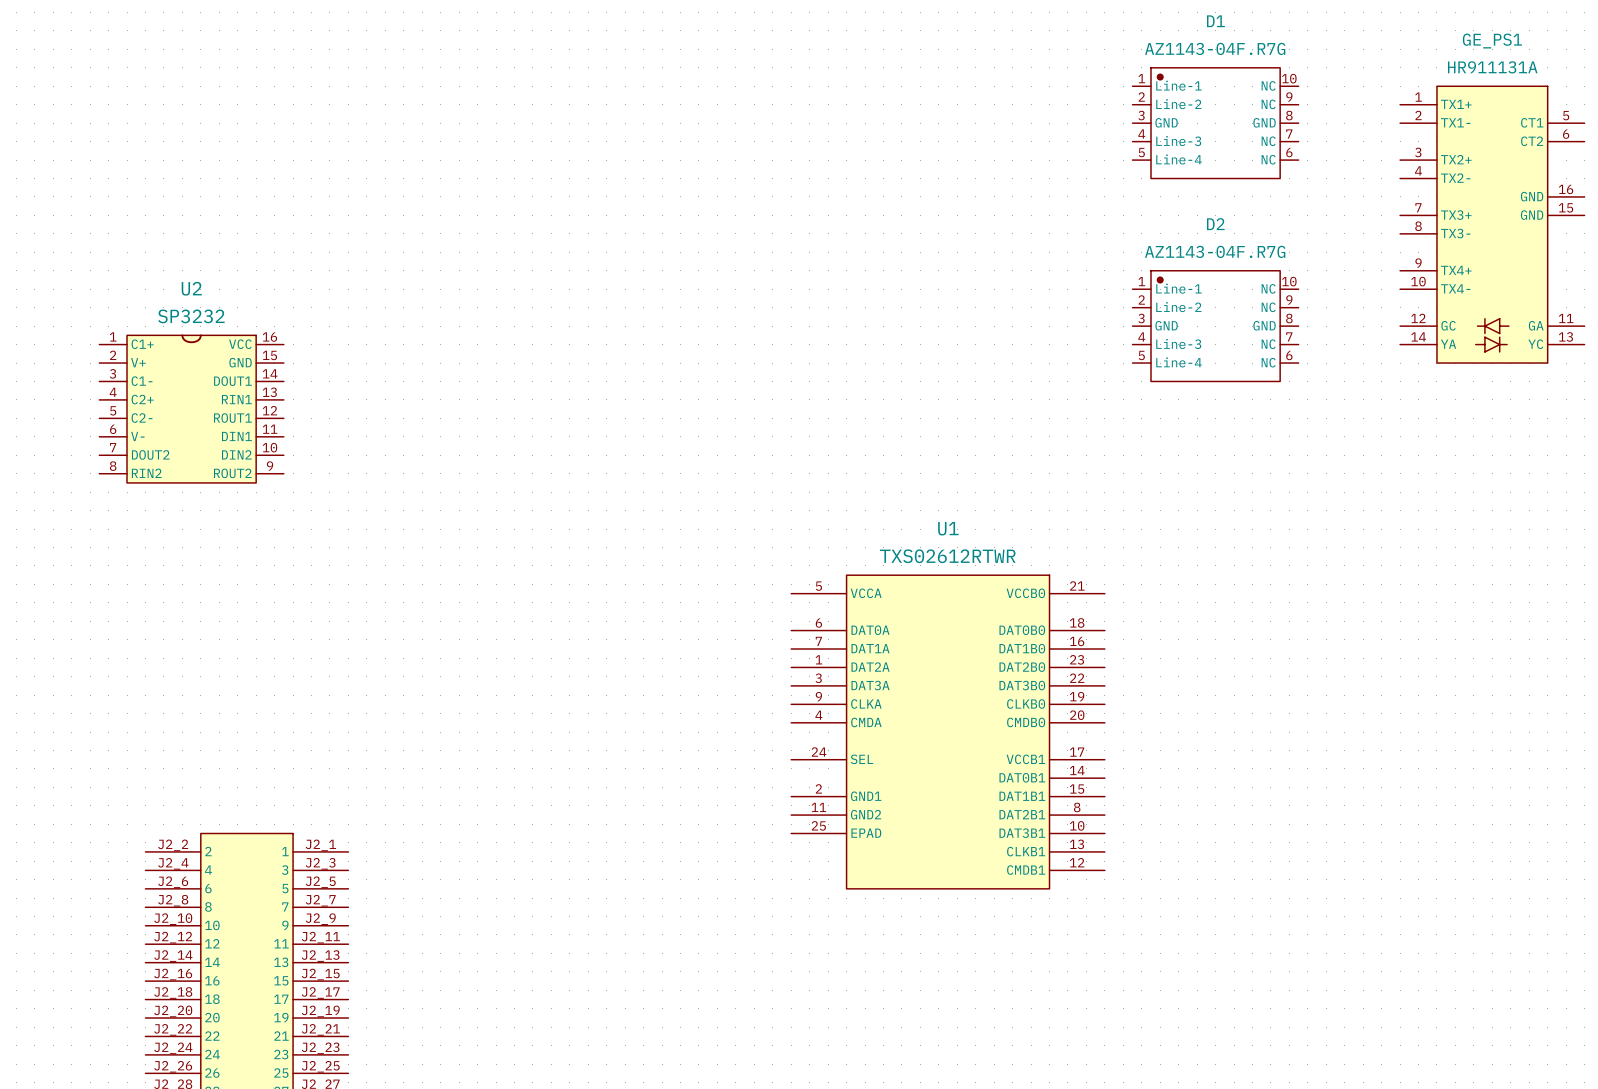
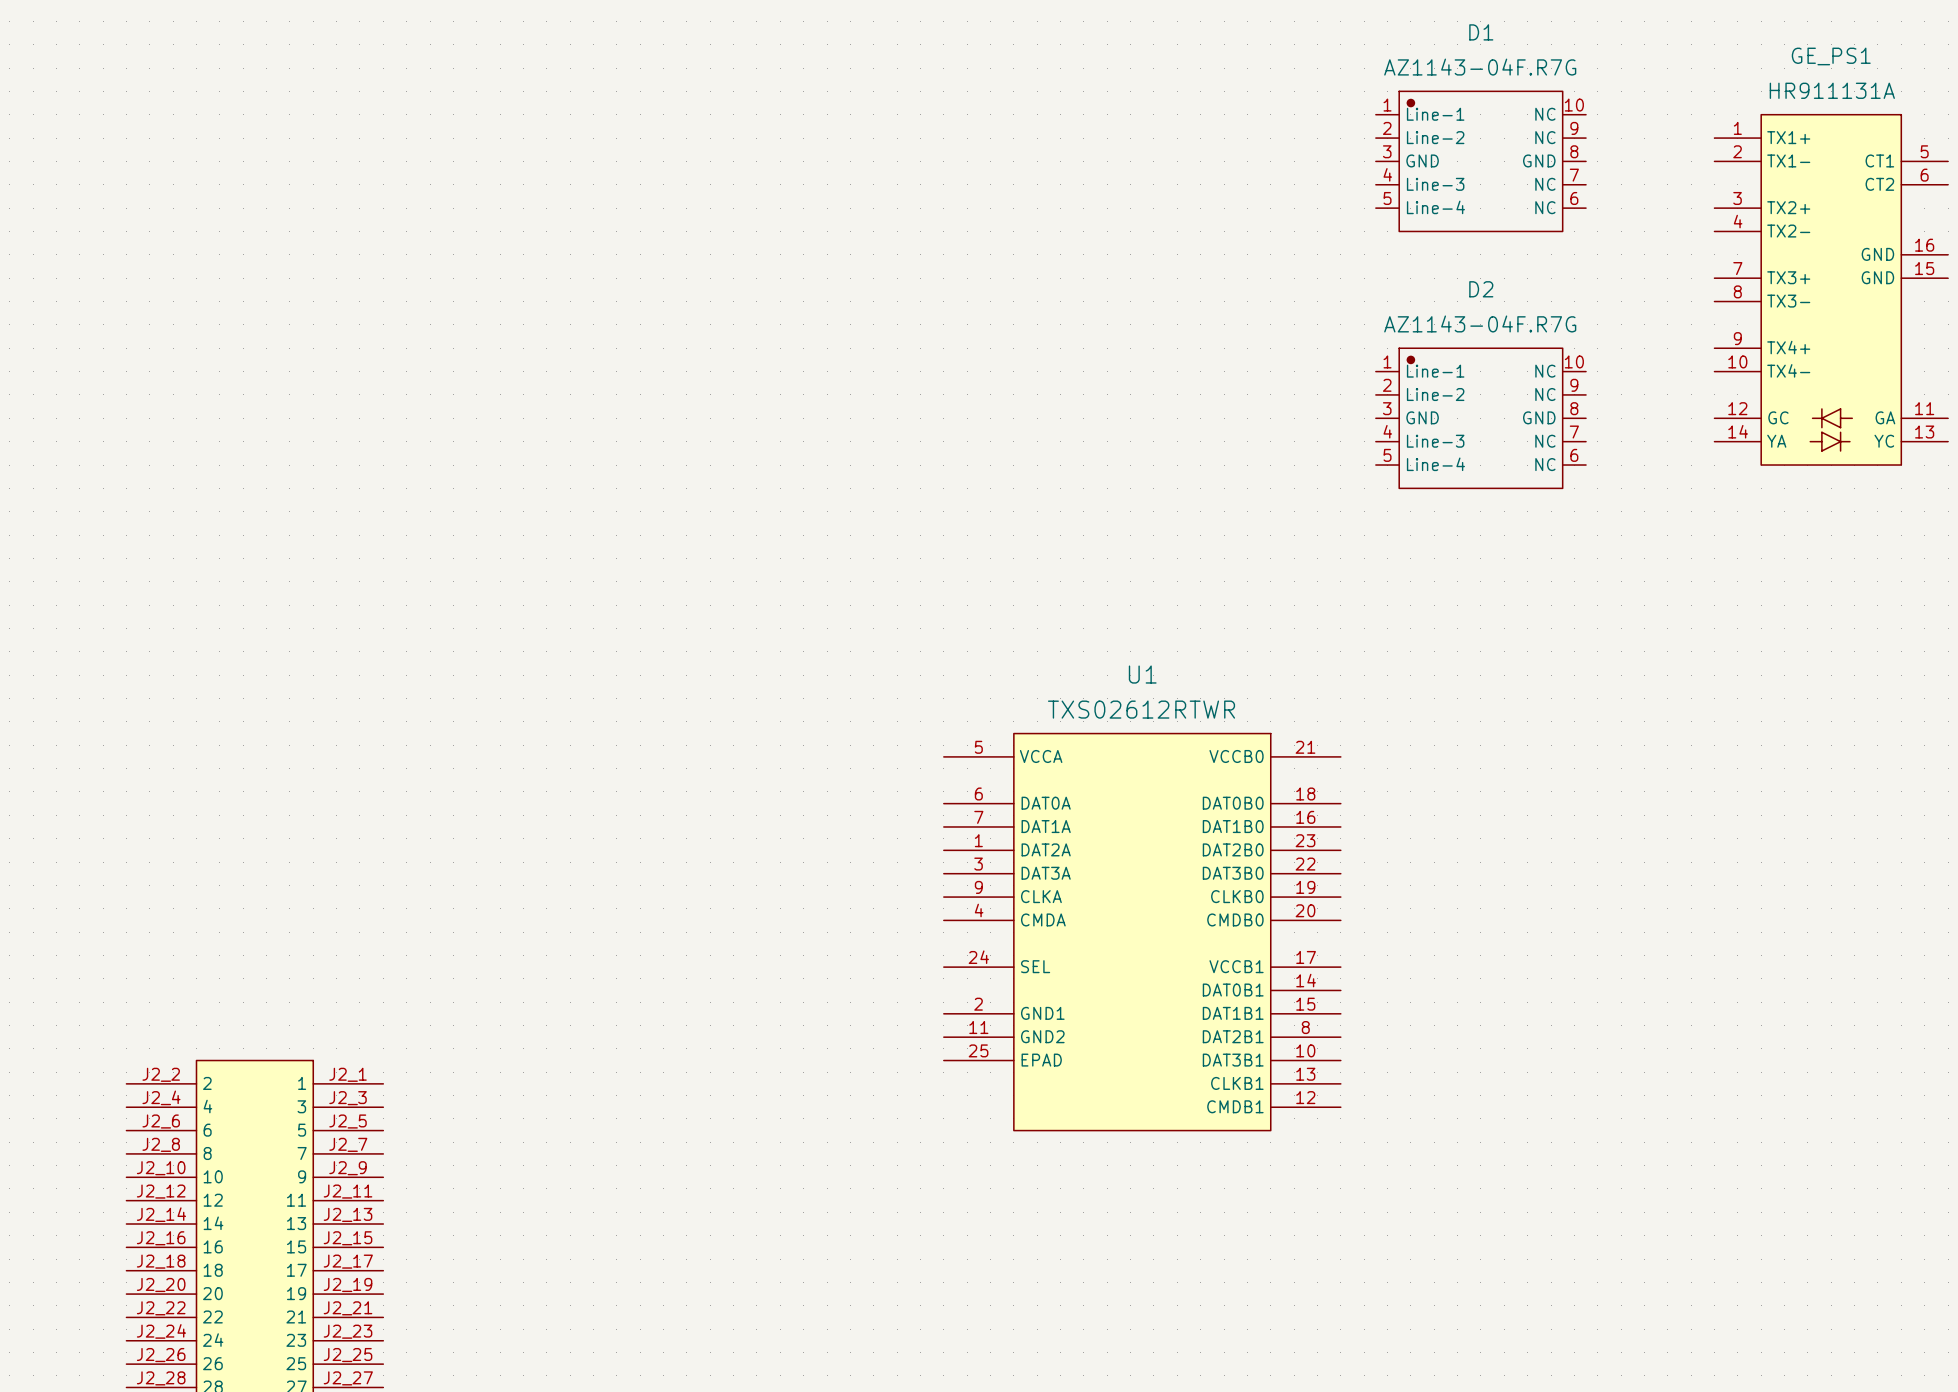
U2: SP3232 (191, 408) -> none

